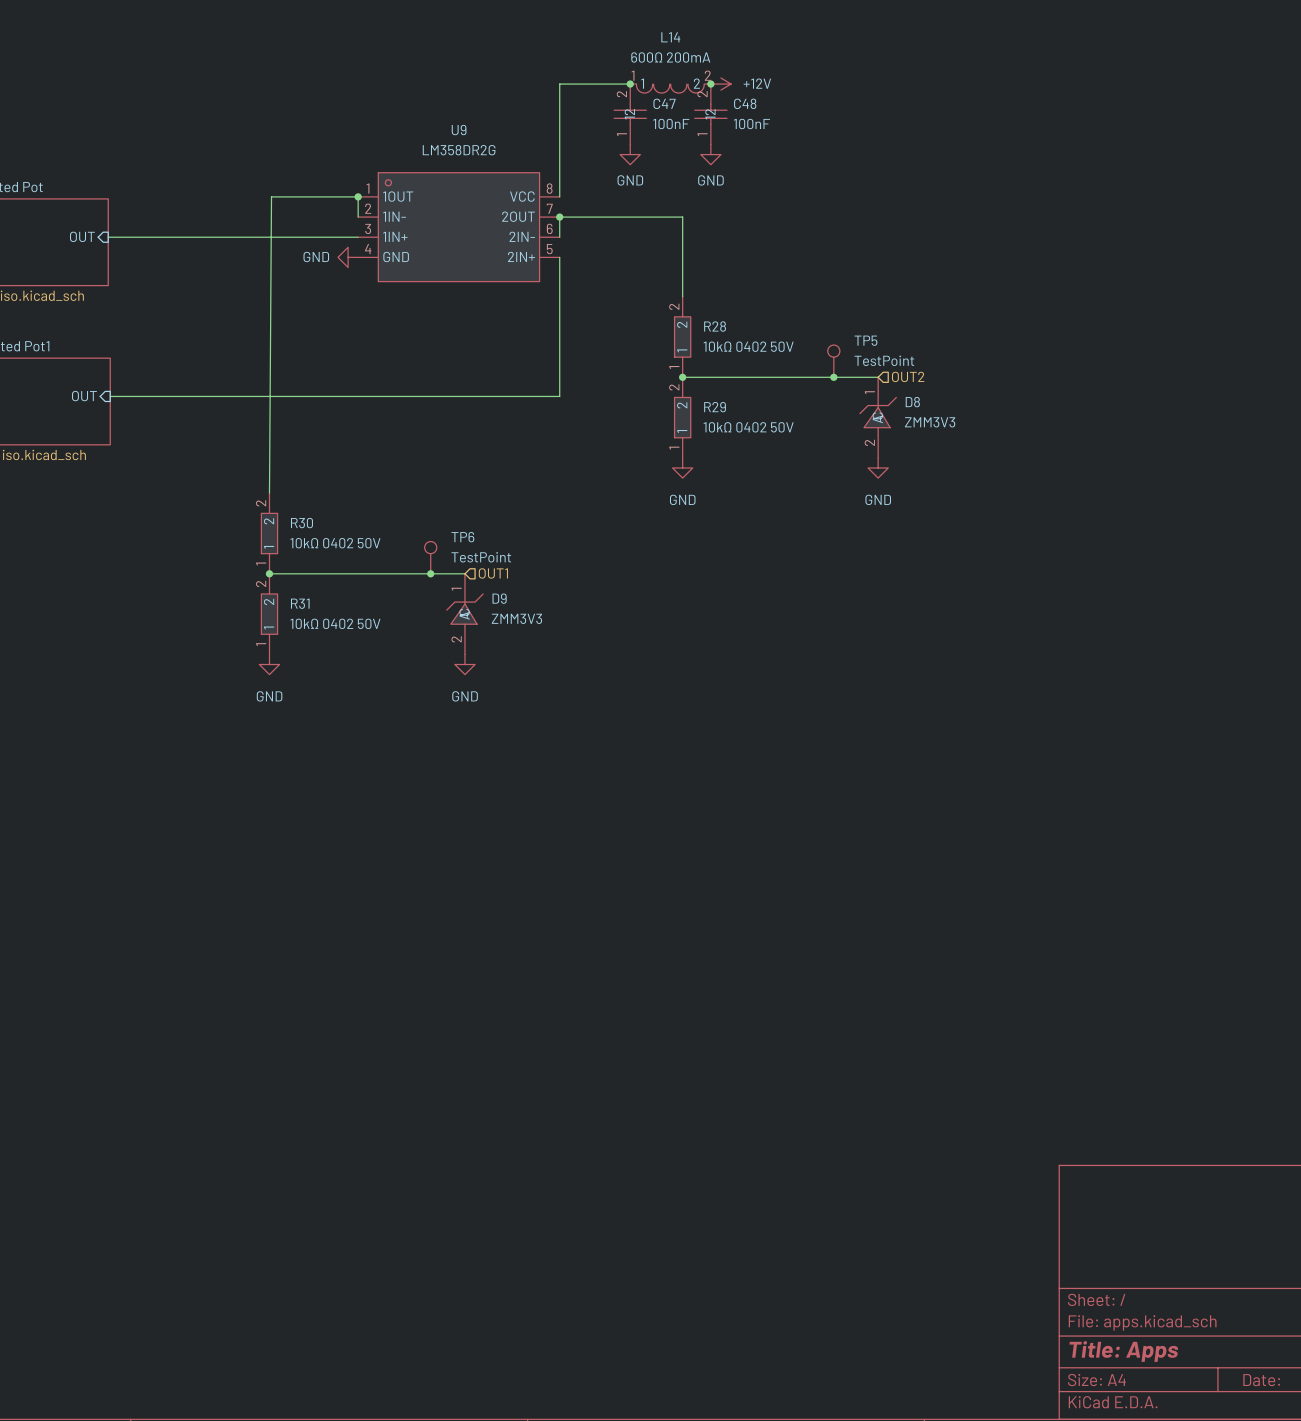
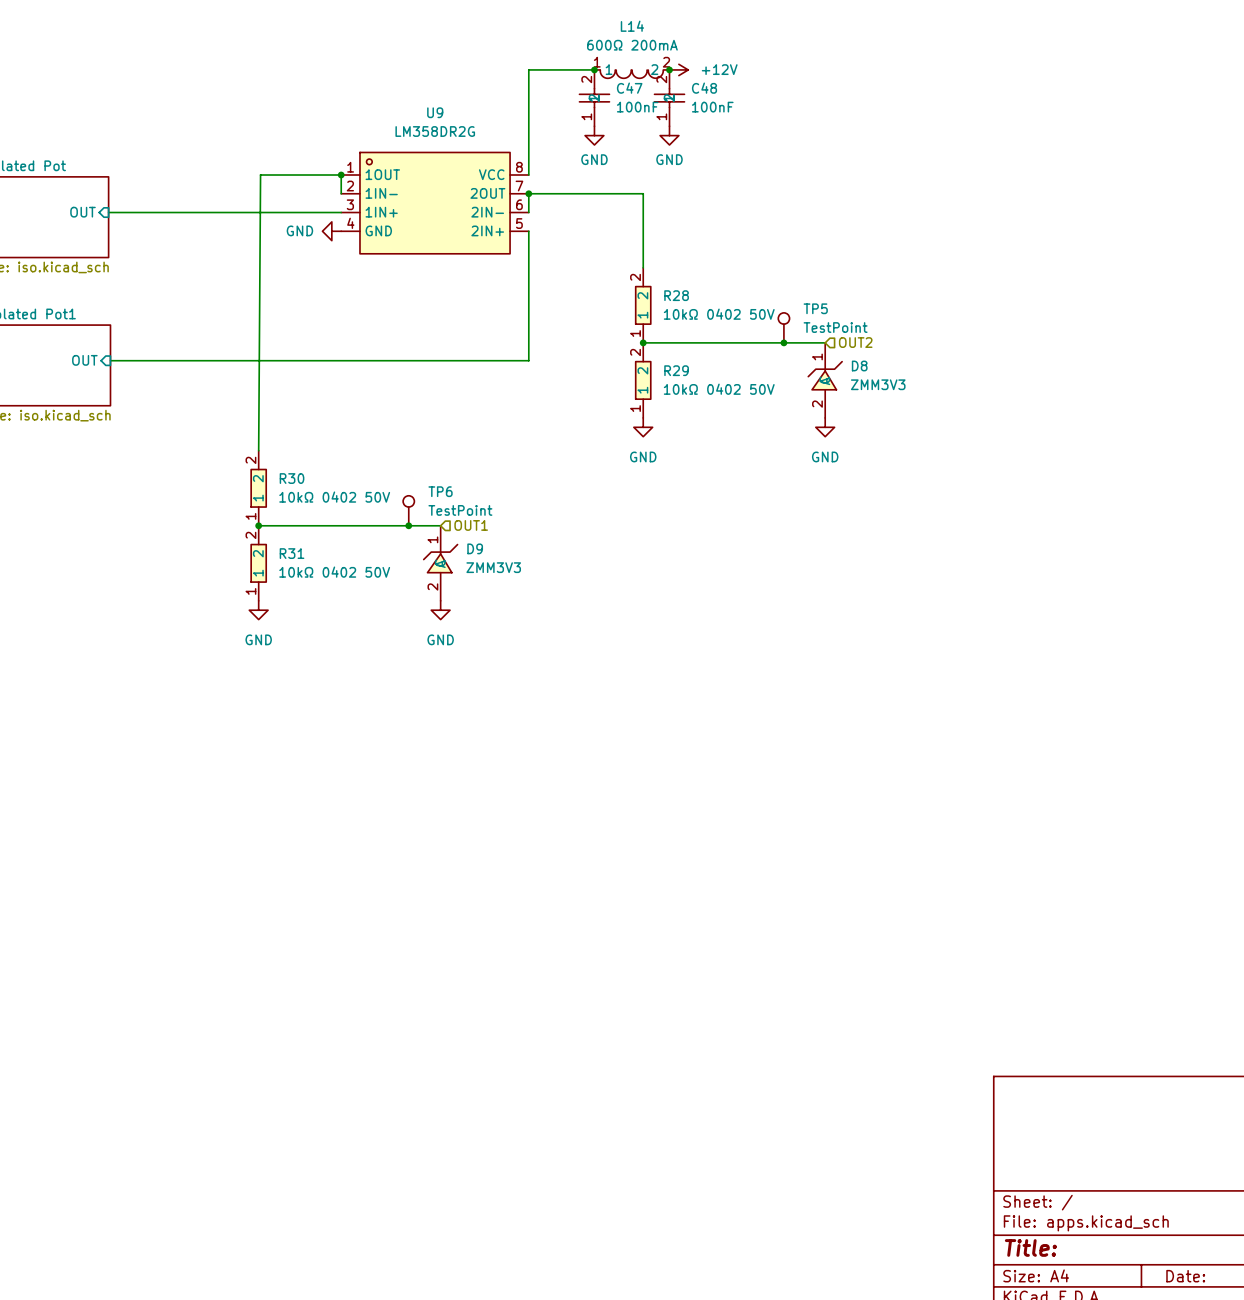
title block: Title: Apps (1123, 1351) -> Title: (1030, 1247)

